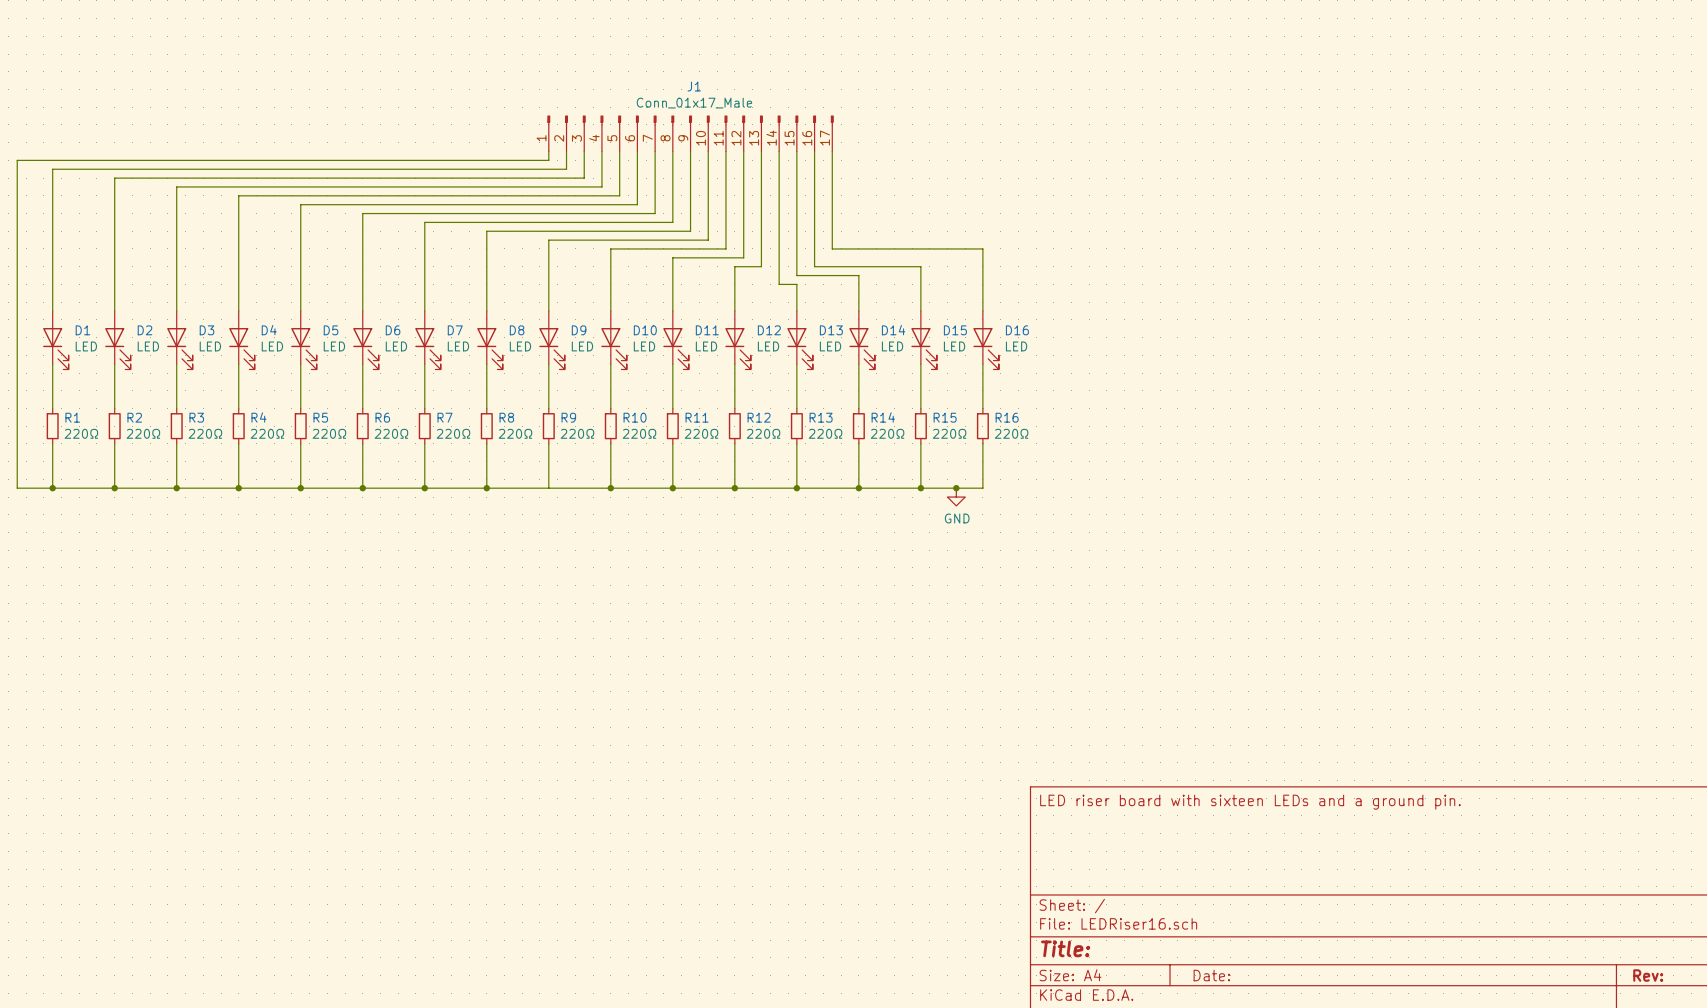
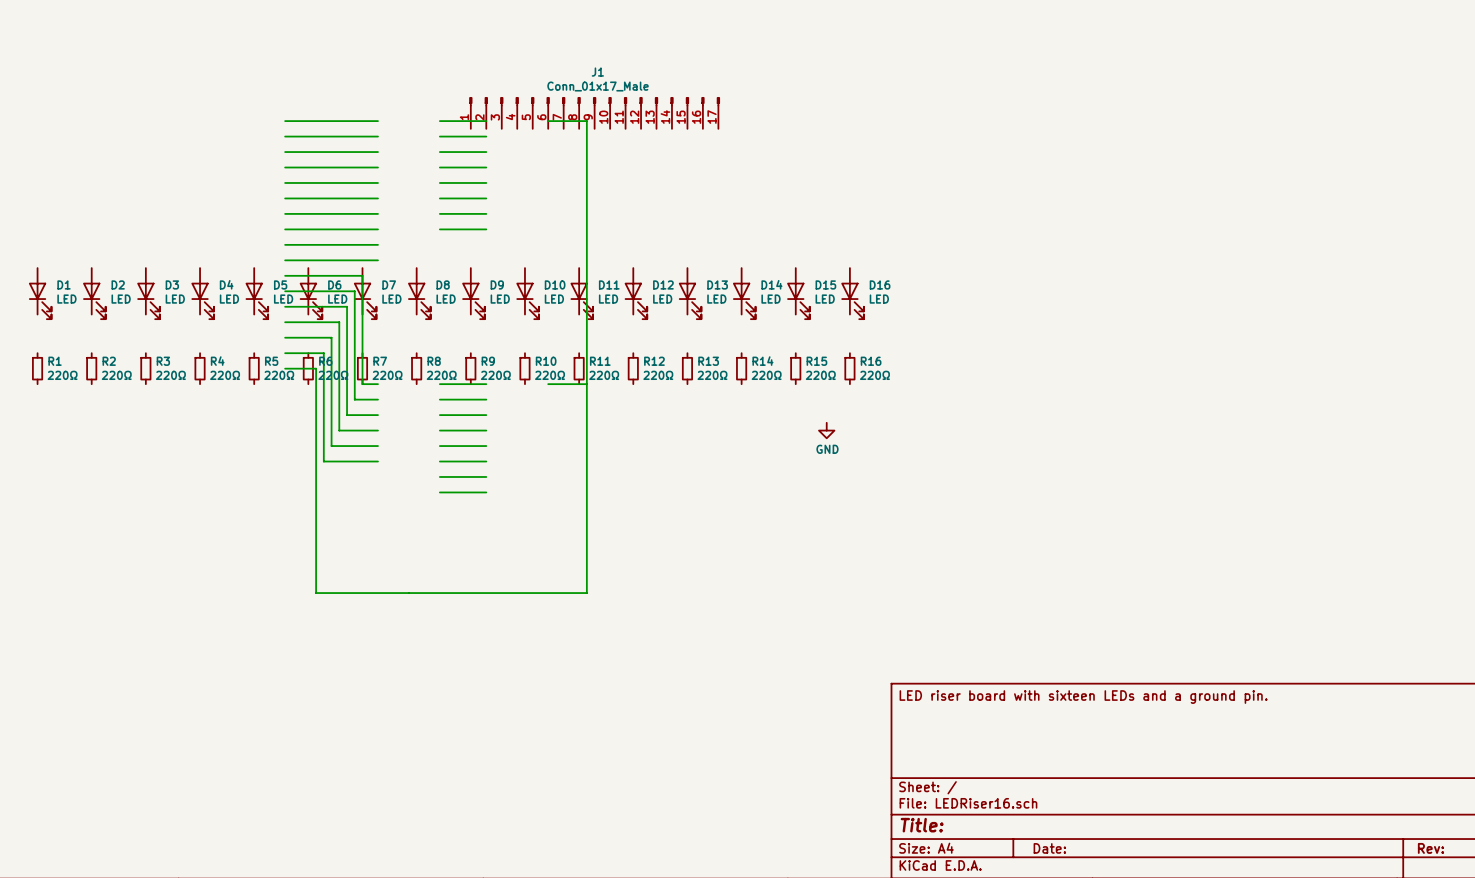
wire: none -> (285, 121) (377, 121)
wire: none -> (439, 121) (486, 121)
wire: none -> (548, 121) (586, 121) (586, 593) (316, 593) (316, 368) (285, 368)
wire: (548, 151) (548, 160) -> (486, 136) (470, 136)
wire: (566, 151) (566, 169) (52, 169) (52, 311) -> none
wire: (584, 151) (584, 178) (566, 178) -> none
wire: (601, 151) (601, 186) (176, 186) (176, 311) -> none
wire: (619, 151) (619, 195) (566, 195) -> none
wire: (637, 151) (637, 204) (300, 204) (300, 311) -> none
wire: (655, 151) (655, 213) (566, 213) -> none
wire: (672, 151) (672, 222) (424, 222) (424, 311) -> none
wire: (690, 151) (690, 231) (566, 231) -> none
wire: (708, 151) (708, 240) (548, 240) (548, 311) -> none
wire: (725, 151) (725, 248) (610, 248) (610, 311) -> none
wire: (743, 151) (743, 257) (672, 257) (672, 311) -> none
wire: (761, 151) (761, 266) (734, 266) (734, 311) -> none
wire: (779, 151) (779, 284) (796, 284) (796, 311) -> none
wire: (796, 151) (796, 275) (858, 275) (858, 311) -> none
wire: (814, 151) (814, 266) (920, 266) (920, 311) -> none
wire: (832, 151) (832, 248) (982, 248) (982, 311) -> none
wire: (336, 160) (17, 160) (17, 488) (982, 488) (982, 443) -> none
wire: (442, 160) (513, 160) -> none
wire: (336, 178) (114, 178) (114, 311) -> none
wire: (442, 178) (513, 178) -> none
wire: (336, 195) (238, 195) (238, 311) -> none
wire: (442, 195) (513, 195) -> none
wire: (362, 213) (362, 311) -> (308, 182) (285, 182)
wire: (442, 213) (513, 213) -> none
wire: none -> (285, 198) (377, 198)
wire: (513, 231) (486, 231) (486, 311) -> none
wire: none -> (285, 213) (377, 213)
wire: none -> (439, 213) (486, 213)
wire: none -> (285, 229) (377, 229)
wire: none -> (439, 229) (486, 229)
wire: none -> (285, 244) (377, 244)
wire: none -> (285, 260) (377, 260)
wire: none -> (285, 275) (362, 275) (362, 314)
wire: none -> (285, 291) (354, 291) (354, 399) (377, 399)
wire: none -> (285, 306) (347, 306) (347, 415) (377, 415)
wire: (52, 364) (52, 408) -> none
wire: (114, 364) (114, 408) -> none
wire: (176, 364) (176, 408) -> none
wire: (238, 364) (238, 408) -> none
wire: (300, 364) (300, 408) -> none
wire: (362, 364) (362, 408) -> none
wire: (486, 364) (486, 408) -> none
wire: (548, 364) (548, 408) -> none
wire: (610, 364) (610, 408) -> none
wire: (672, 364) (672, 408) -> none
wire: (734, 364) (734, 408) -> none
wire: (796, 364) (796, 408) -> none
wire: (858, 364) (858, 408) -> none
wire: (920, 364) (920, 408) -> none
wire: (982, 364) (982, 408) -> none
wire: none -> (285, 322) (339, 322) (339, 430) (377, 430)
wire: none -> (285, 337) (331, 337) (331, 446) (377, 446)
wire: none -> (285, 353) (323, 353) (323, 461) (377, 461)
wire: none -> (362, 353) (362, 384) (377, 384)
wire: (52, 443) (52, 488) -> none
wire: (114, 443) (114, 488) -> none
wire: (176, 443) (176, 488) -> none
wire: (238, 443) (238, 488) -> none
wire: (300, 443) (300, 488) -> none
wire: (362, 443) (362, 488) -> none
wire: (424, 443) (424, 488) -> none
wire: (486, 443) (486, 488) -> none
wire: none -> (439, 384) (486, 384)
wire: (548, 443) (548, 488) -> none
wire: (610, 443) (610, 488) -> none
wire: none -> (548, 384) (586, 384)
wire: (672, 443) (672, 488) -> none
wire: (734, 443) (734, 488) -> none
wire: (796, 443) (796, 488) -> none
wire: (858, 443) (858, 488) -> none
wire: (920, 443) (920, 488) -> none
wire: none -> (439, 399) (486, 399)
wire: none -> (439, 415) (486, 415)
junction: (52, 488) -> none
junction: (114, 488) -> none
junction: (176, 488) -> none
junction: (238, 488) -> none
junction: (300, 488) -> none
junction: (362, 488) -> none
junction: (424, 488) -> none
junction: (486, 488) -> none
junction: (610, 488) -> none
junction: (672, 488) -> none
junction: (734, 488) -> none
junction: (796, 488) -> none
junction: (858, 488) -> none
junction: (920, 488) -> none
junction: (956, 488) -> none
wire: none -> (439, 430) (486, 430)
wire: none -> (439, 446) (486, 446)
wire: none -> (439, 461) (486, 461)
wire: none -> (439, 476) (486, 476)
wire: none -> (439, 492) (486, 492)

